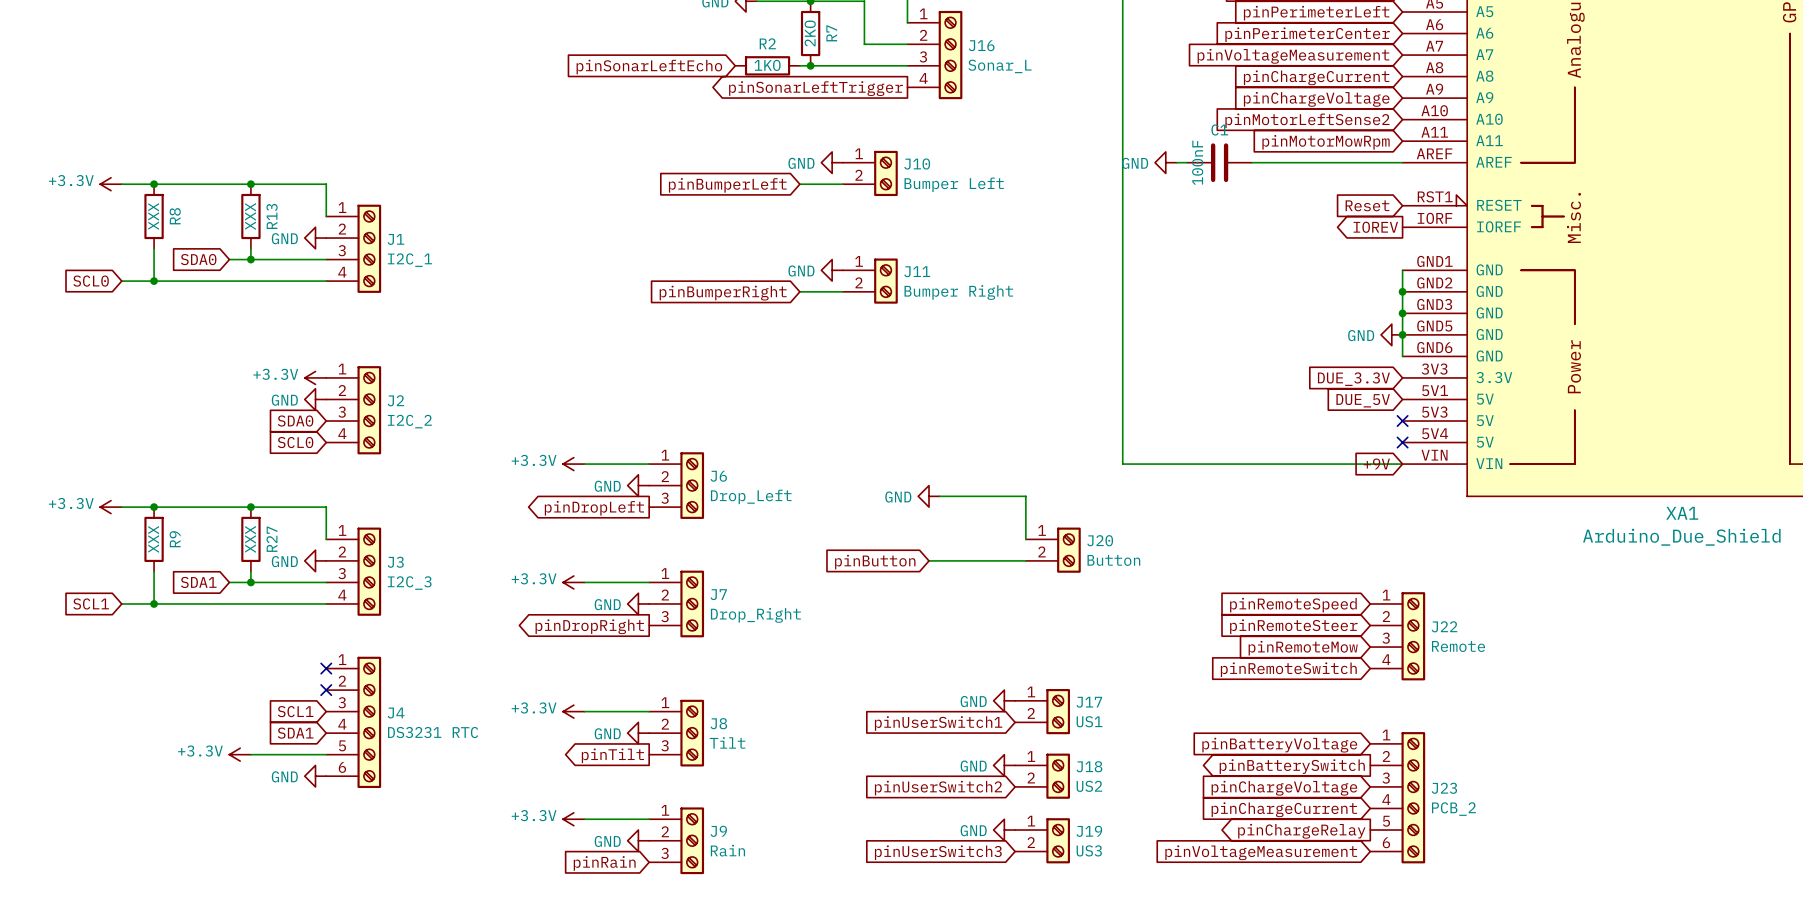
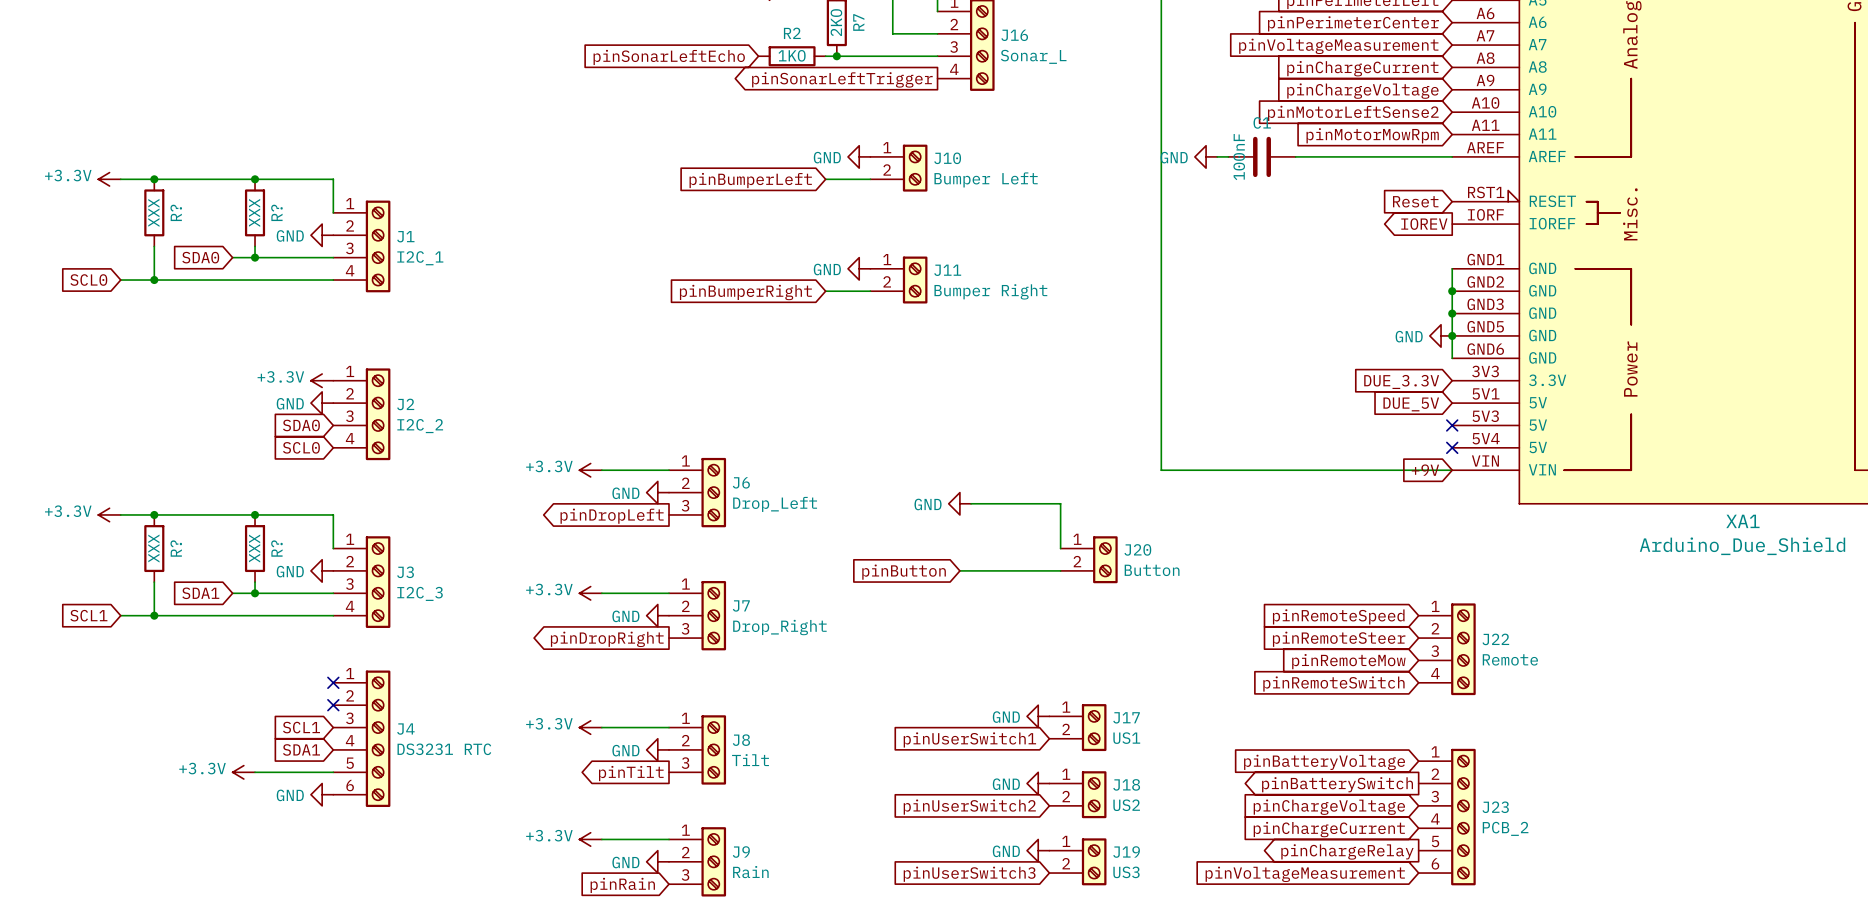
R8 name: R8 (175, 216) -> R? (176, 212)
R13 name: R13 (272, 216) -> R? (276, 212)
R9 name: R9 (175, 539) -> R? (176, 548)
R27 name: R27 (271, 539) -> R? (276, 548)

